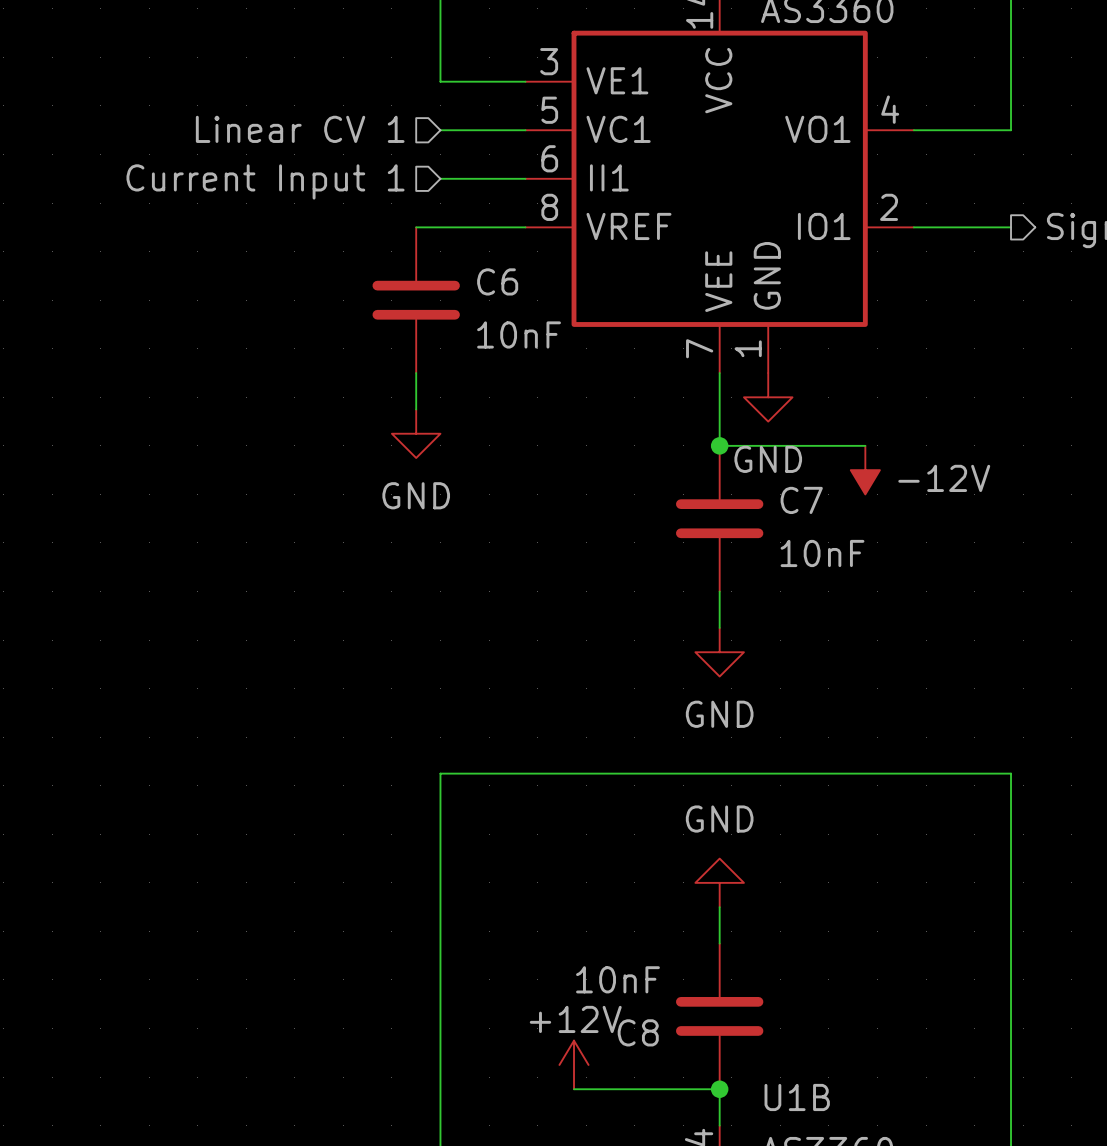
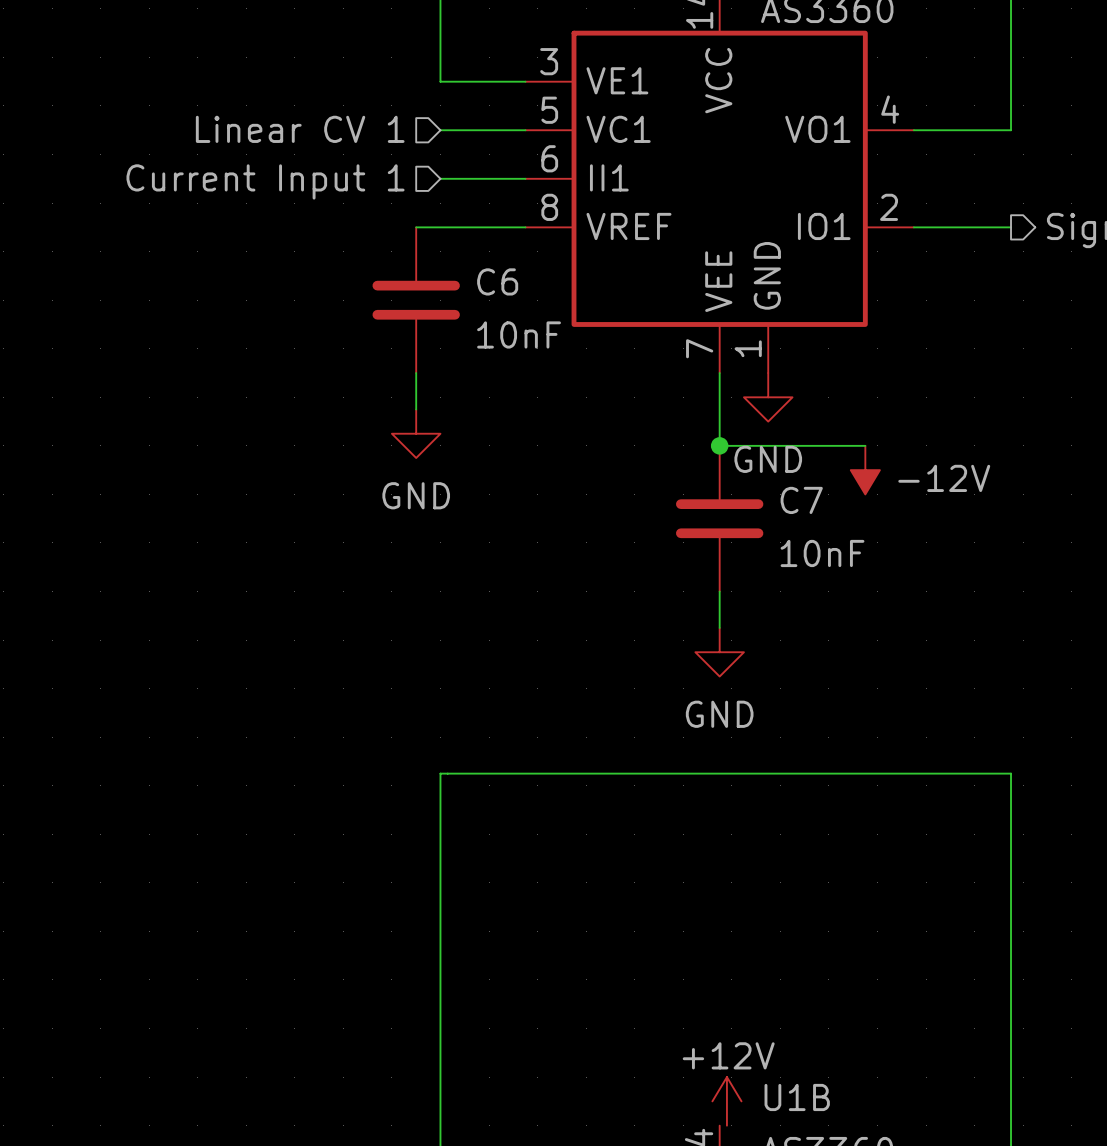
power symbol: GND (719, 882) -> none
wire: (719, 907) (719, 943) -> none
C8: 10nF (719, 1016) -> none
power symbol position: +12V (574, 1064) -> +12V (726, 1101)
wire: (574, 1089) (719, 1089) (719, 1125) -> none
junction: (719, 1089) -> none

